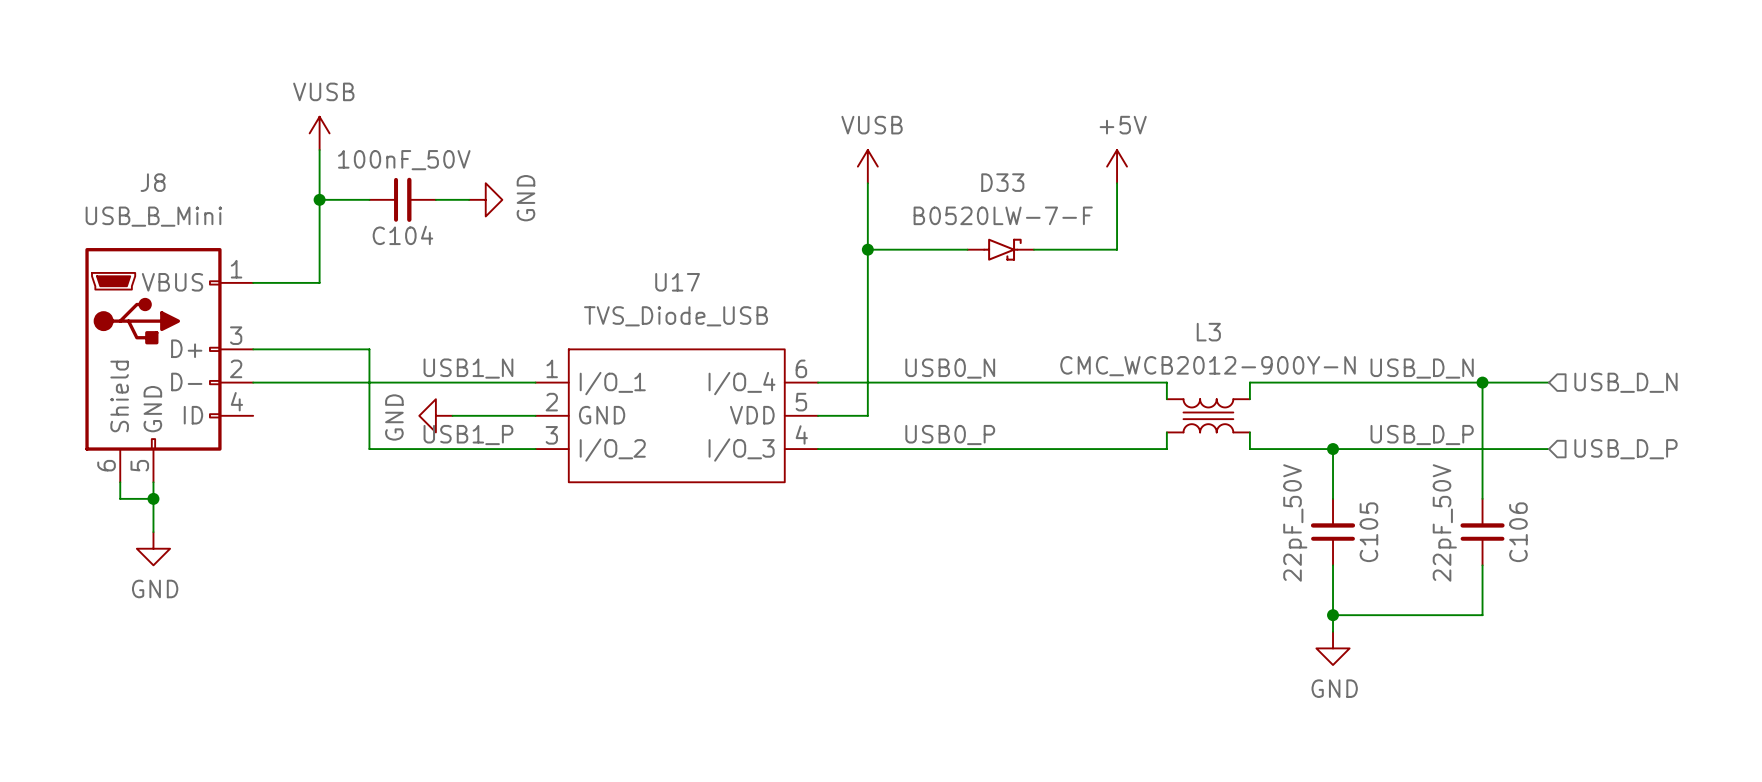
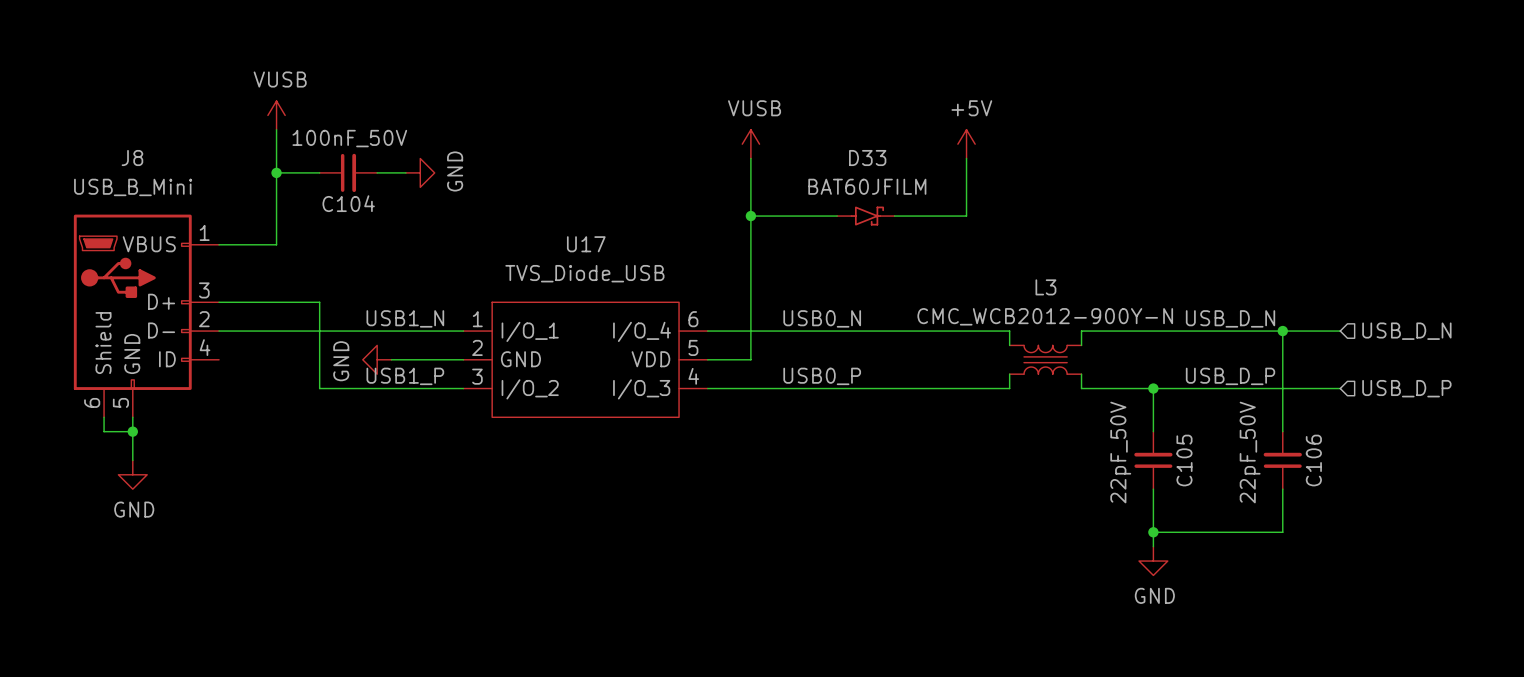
D33 value: B0520LW-7-F (1003, 215) -> BAT60JFILM (867, 186)

